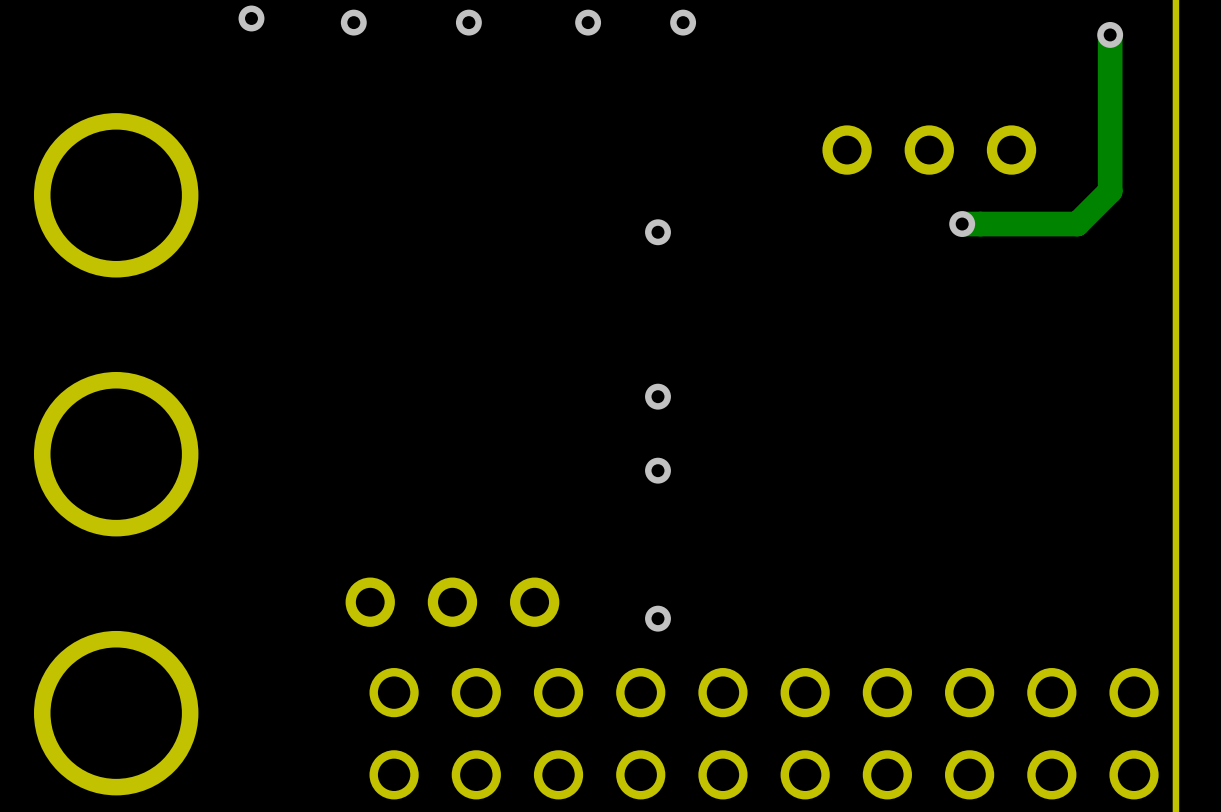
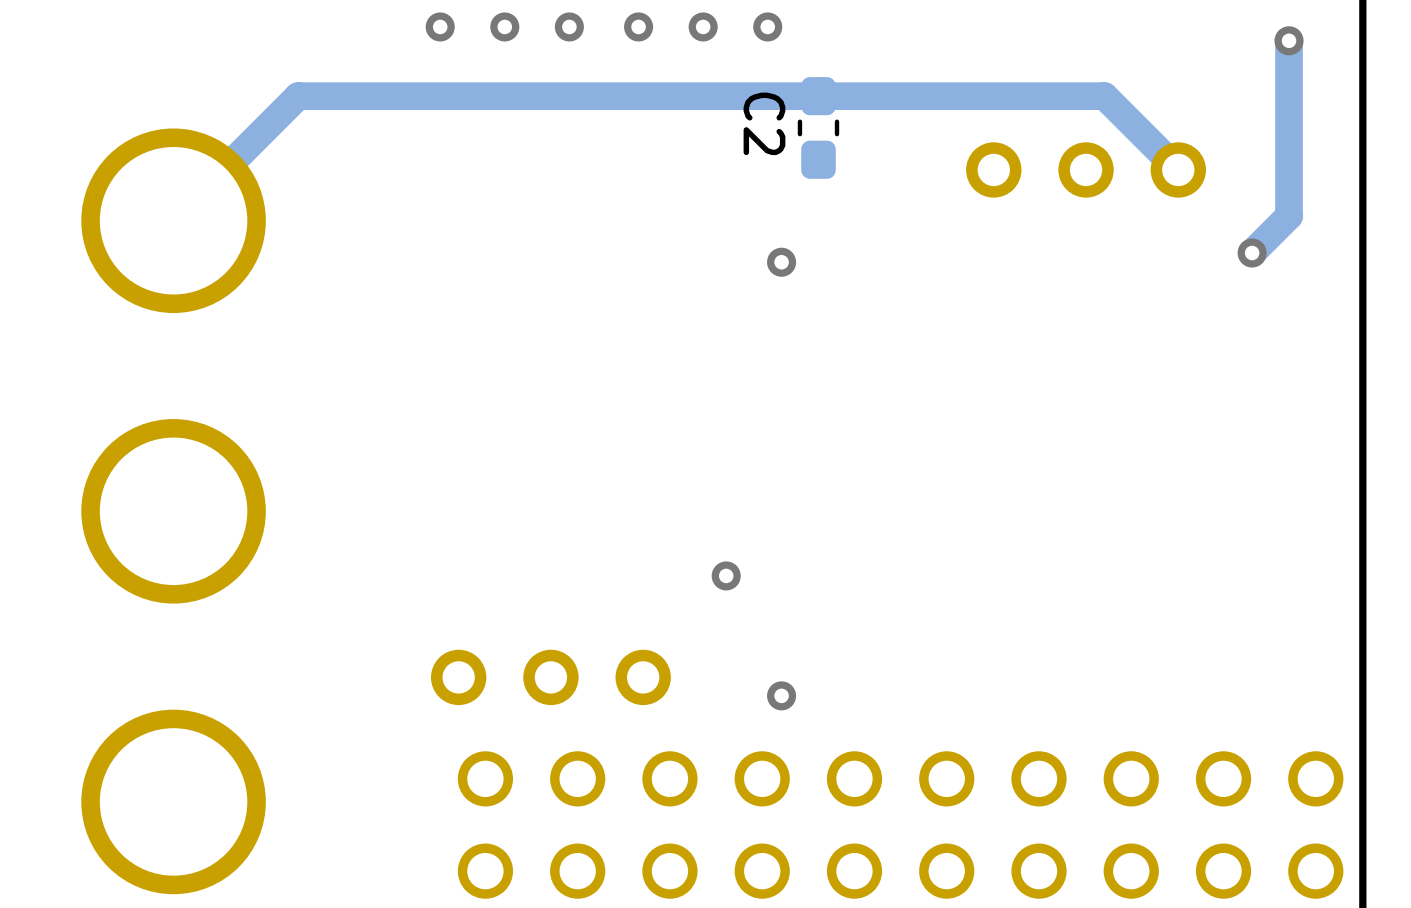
via: (251, 18) -> none
via: none -> (504, 26)
via: none -> (638, 26)
via position: (683, 22) -> (767, 26)
C2: none -> (818, 127)
track: none -> (1178, 169) (1104, 96) (298, 96) (173, 220)
via position: (962, 224) -> (1252, 253)
track: (1077, 224) (962, 224) -> none
via: (657, 396) -> none
via: (657, 470) -> none
via: none -> (726, 575)

